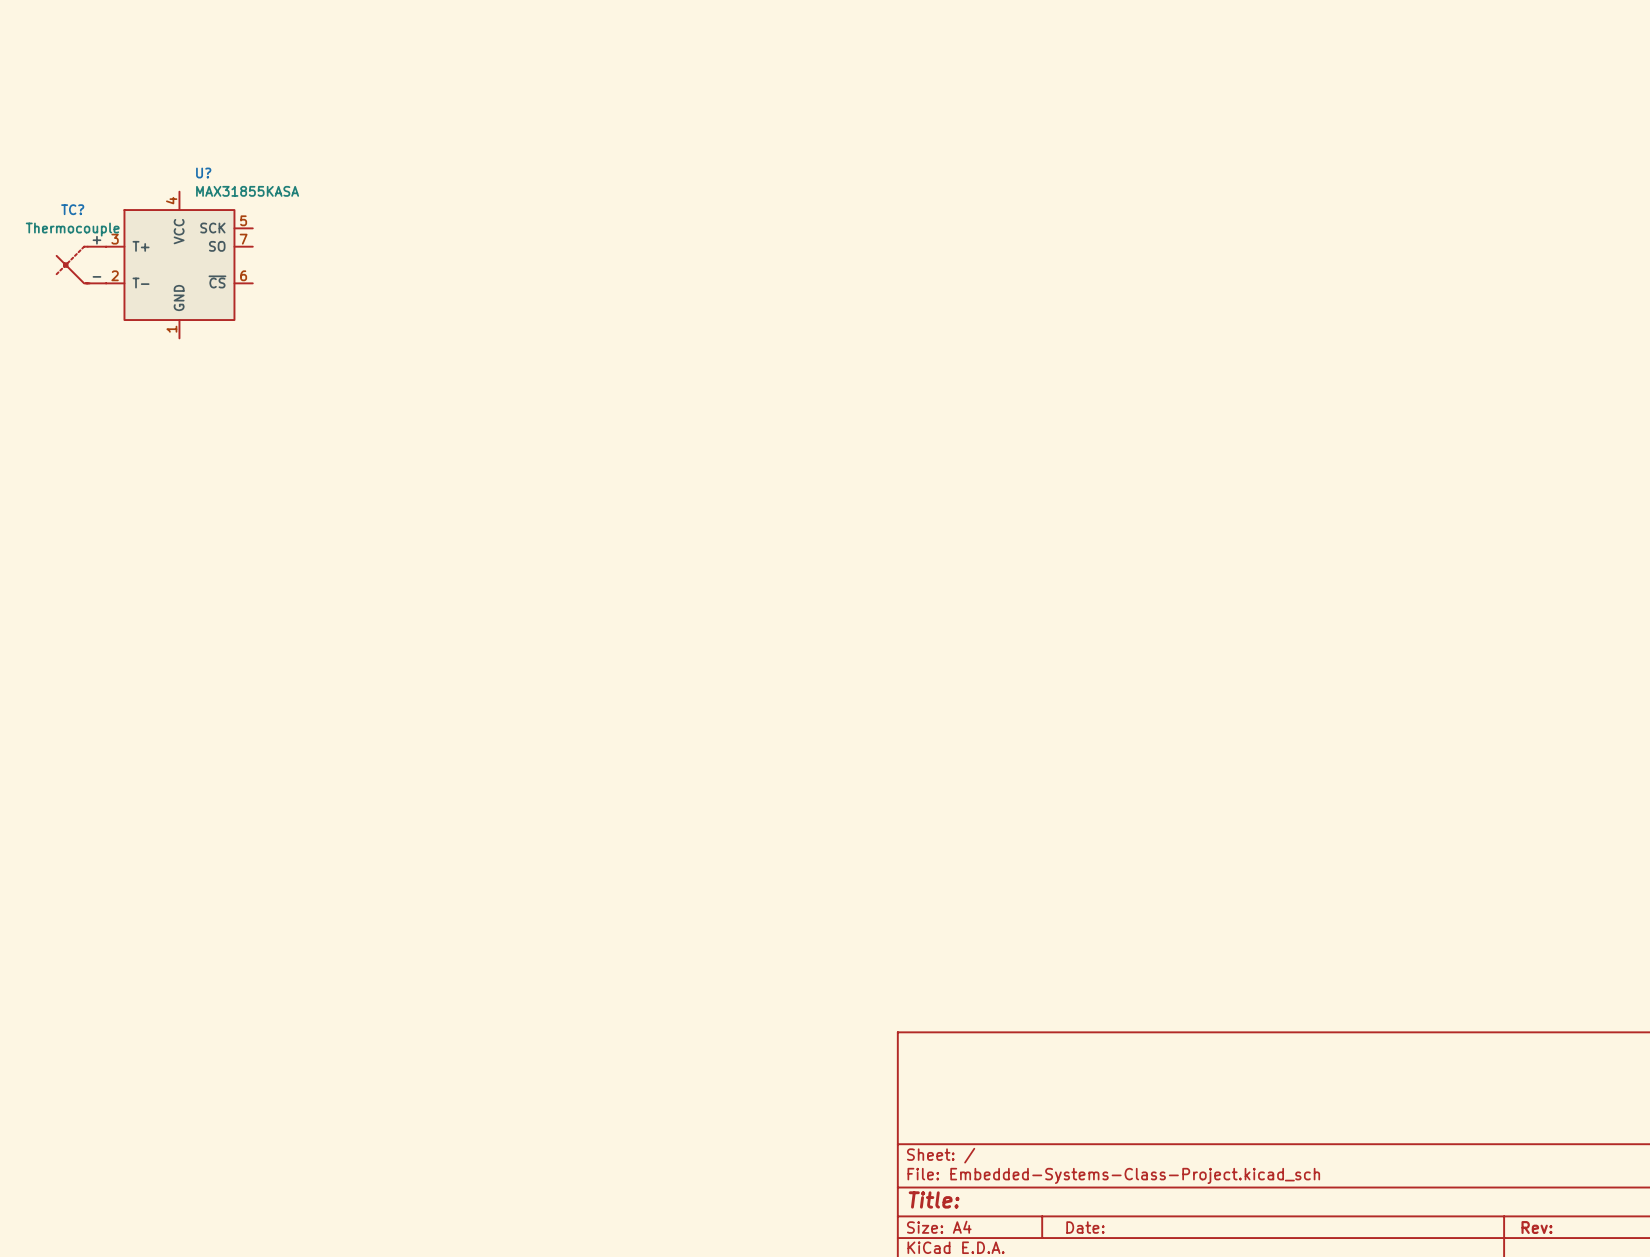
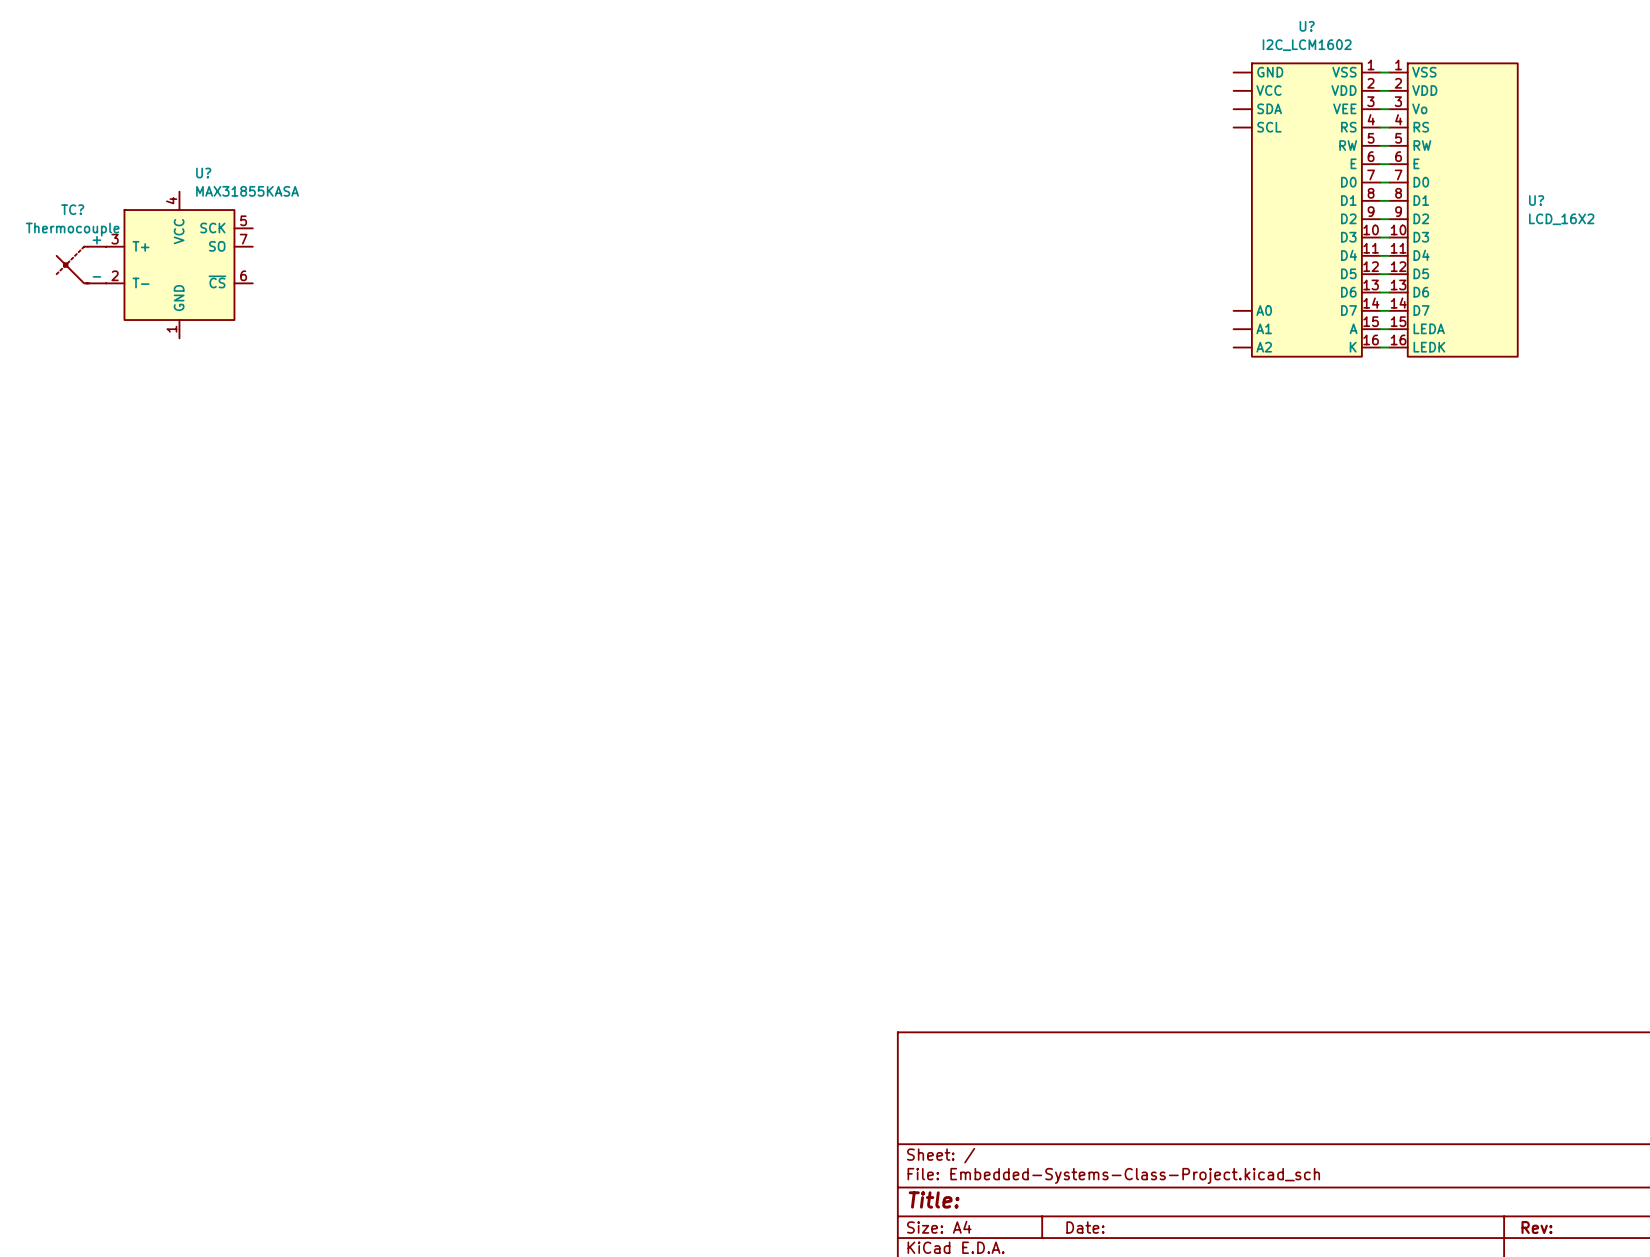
wire: none -> (1380, 72) (1389, 72)
wire: none -> (1380, 90) (1389, 90)
wire: none -> (1380, 109) (1389, 109)
wire: none -> (1380, 127) (1389, 127)
wire: none -> (1380, 145) (1389, 145)
wire: none -> (1380, 164) (1389, 164)
wire: none -> (1380, 182) (1389, 182)
wire: none -> (1380, 200) (1389, 200)
U?: none -> I2C_LCM1602 (1306, 210)
U?: none -> LCD_16X2 (1454, 210)
wire: none -> (1380, 219) (1389, 219)
wire: none -> (1380, 237) (1389, 237)
wire: none -> (1380, 255) (1389, 255)
wire: none -> (1380, 274) (1389, 274)
wire: none -> (1380, 292) (1389, 292)
wire: none -> (1380, 310) (1389, 310)
wire: none -> (1380, 329) (1389, 329)
wire: none -> (1380, 347) (1389, 347)

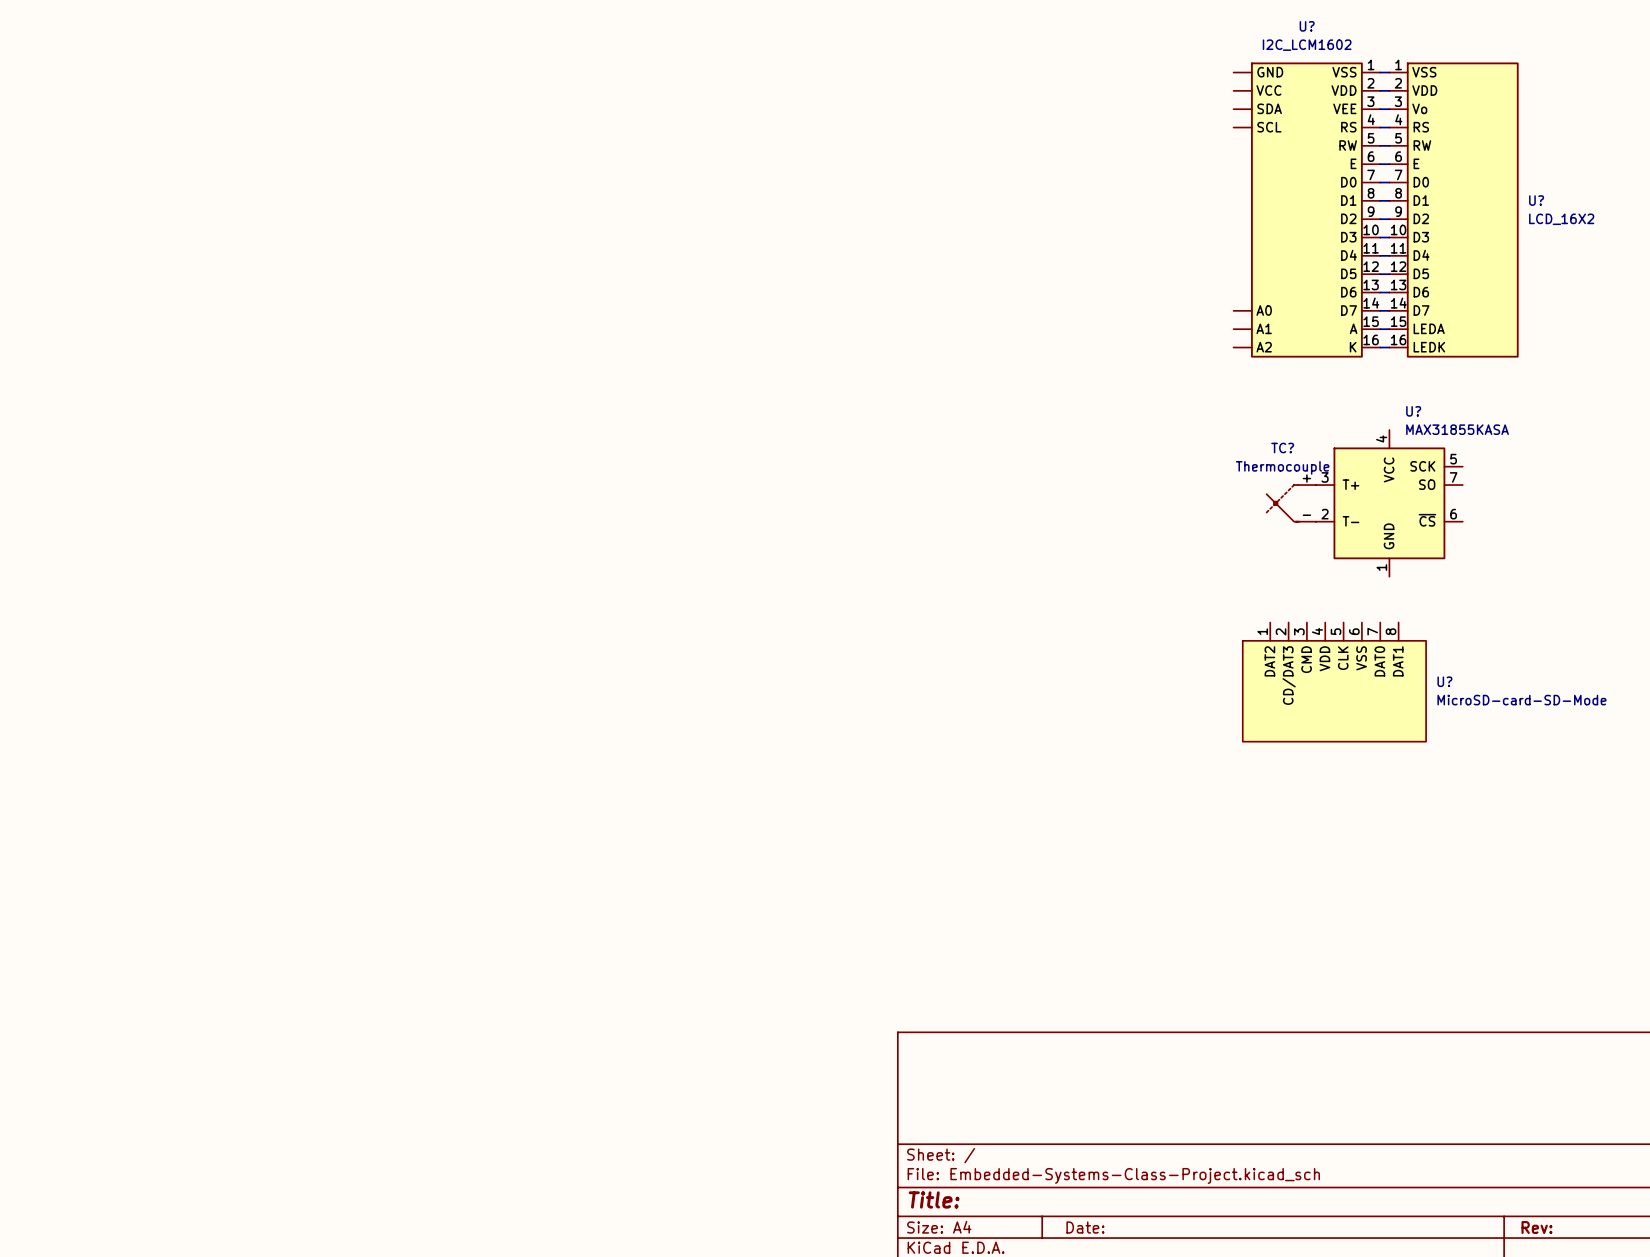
TC?: Thermocouple (81, 265) -> none
U?: MAX31855KASA (179, 265) -> none
TC?: none -> Thermocouple (1291, 503)
U?: none -> MAX31855KASA (1389, 503)
U?: none -> MicroSD-card-SD-Mode (1334, 682)

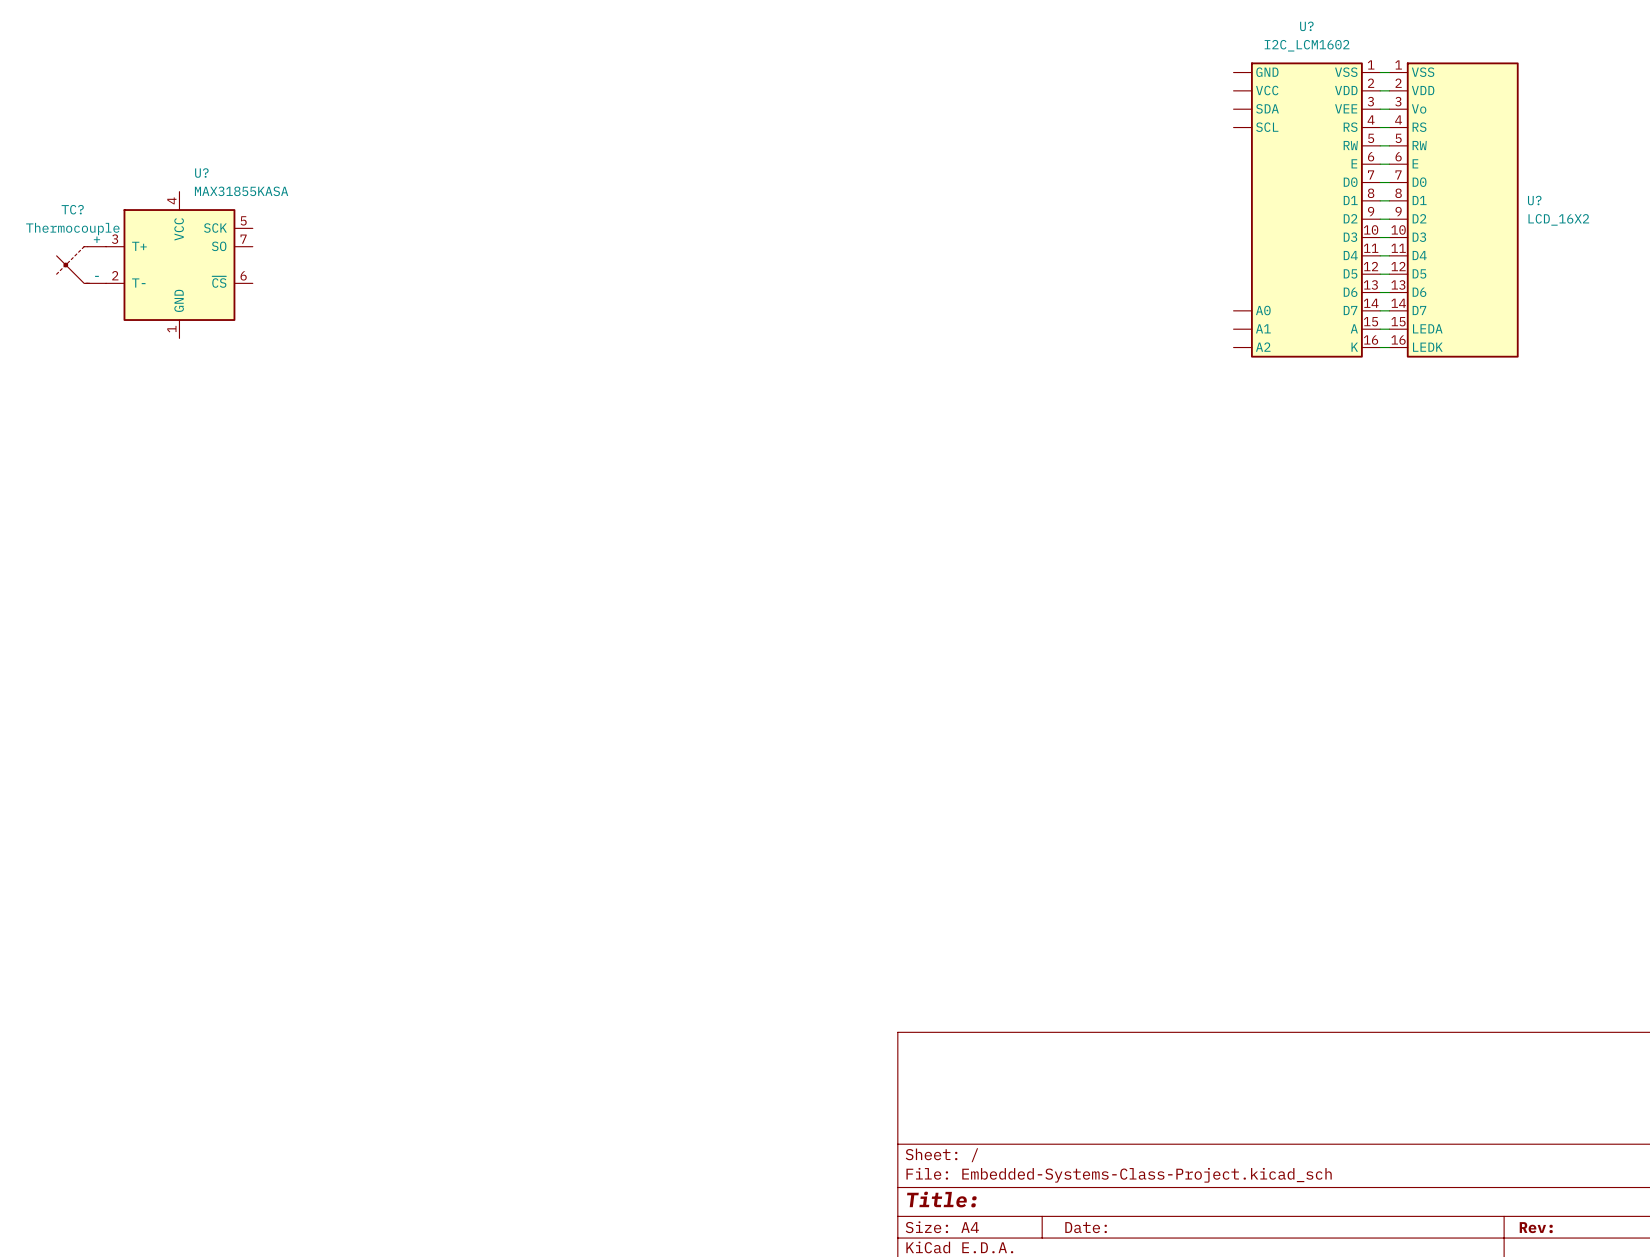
TC?: none -> Thermocouple (81, 265)
U?: none -> MAX31855KASA (179, 265)
TC?: Thermocouple (1291, 503) -> none
U?: MAX31855KASA (1389, 503) -> none
U?: MicroSD-card-SD-Mode (1334, 682) -> none

